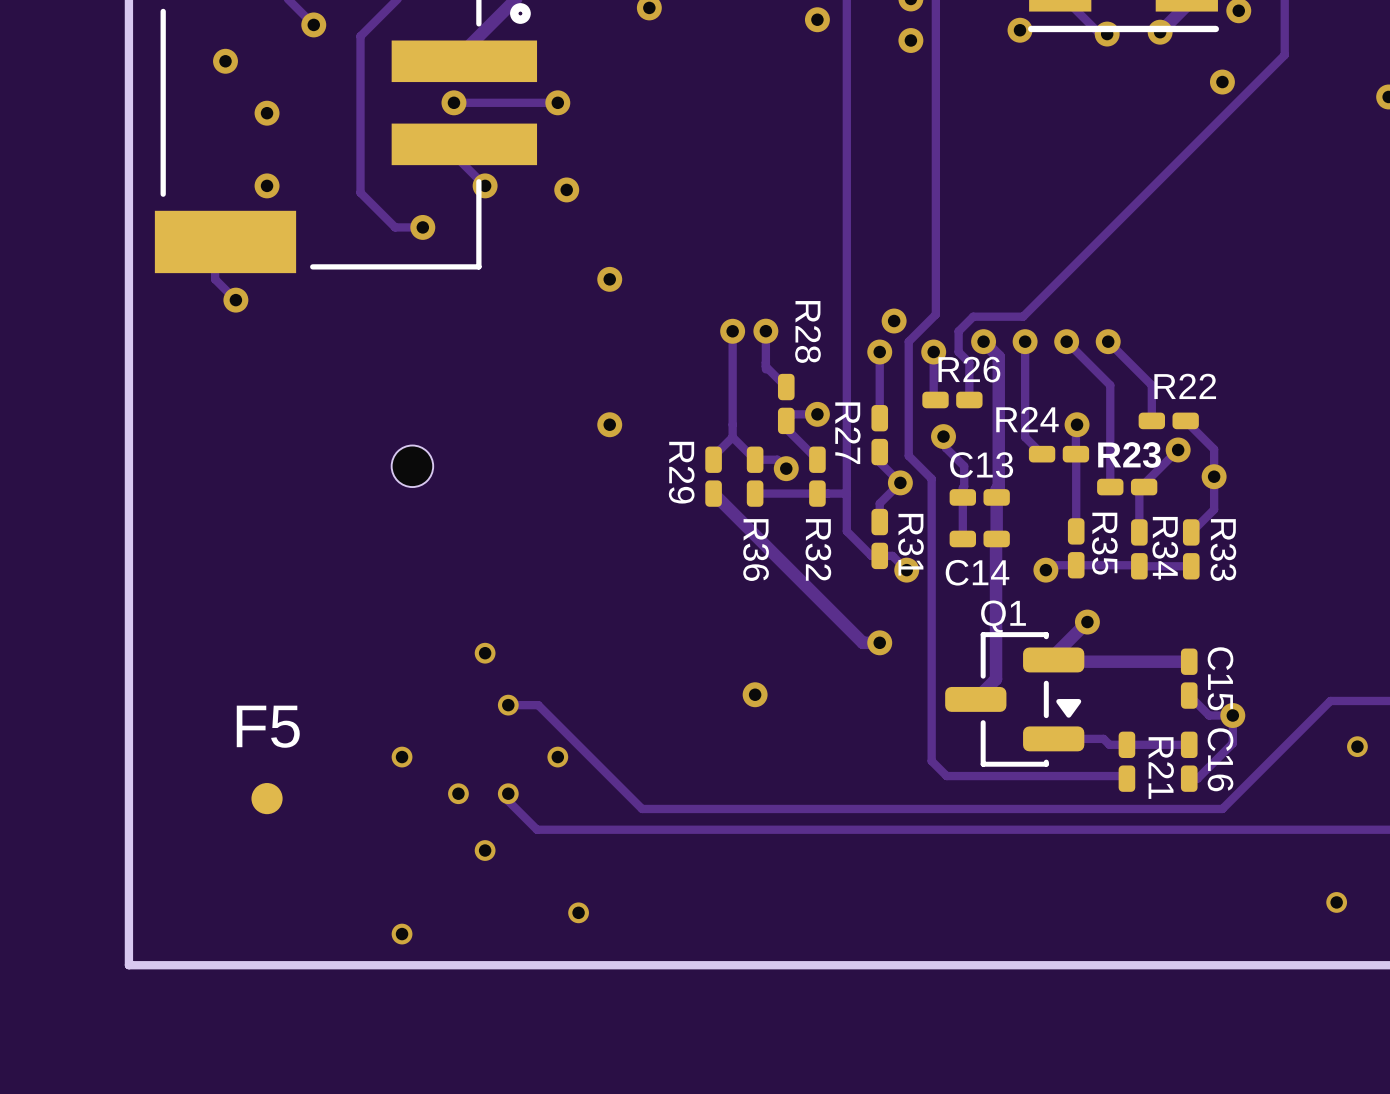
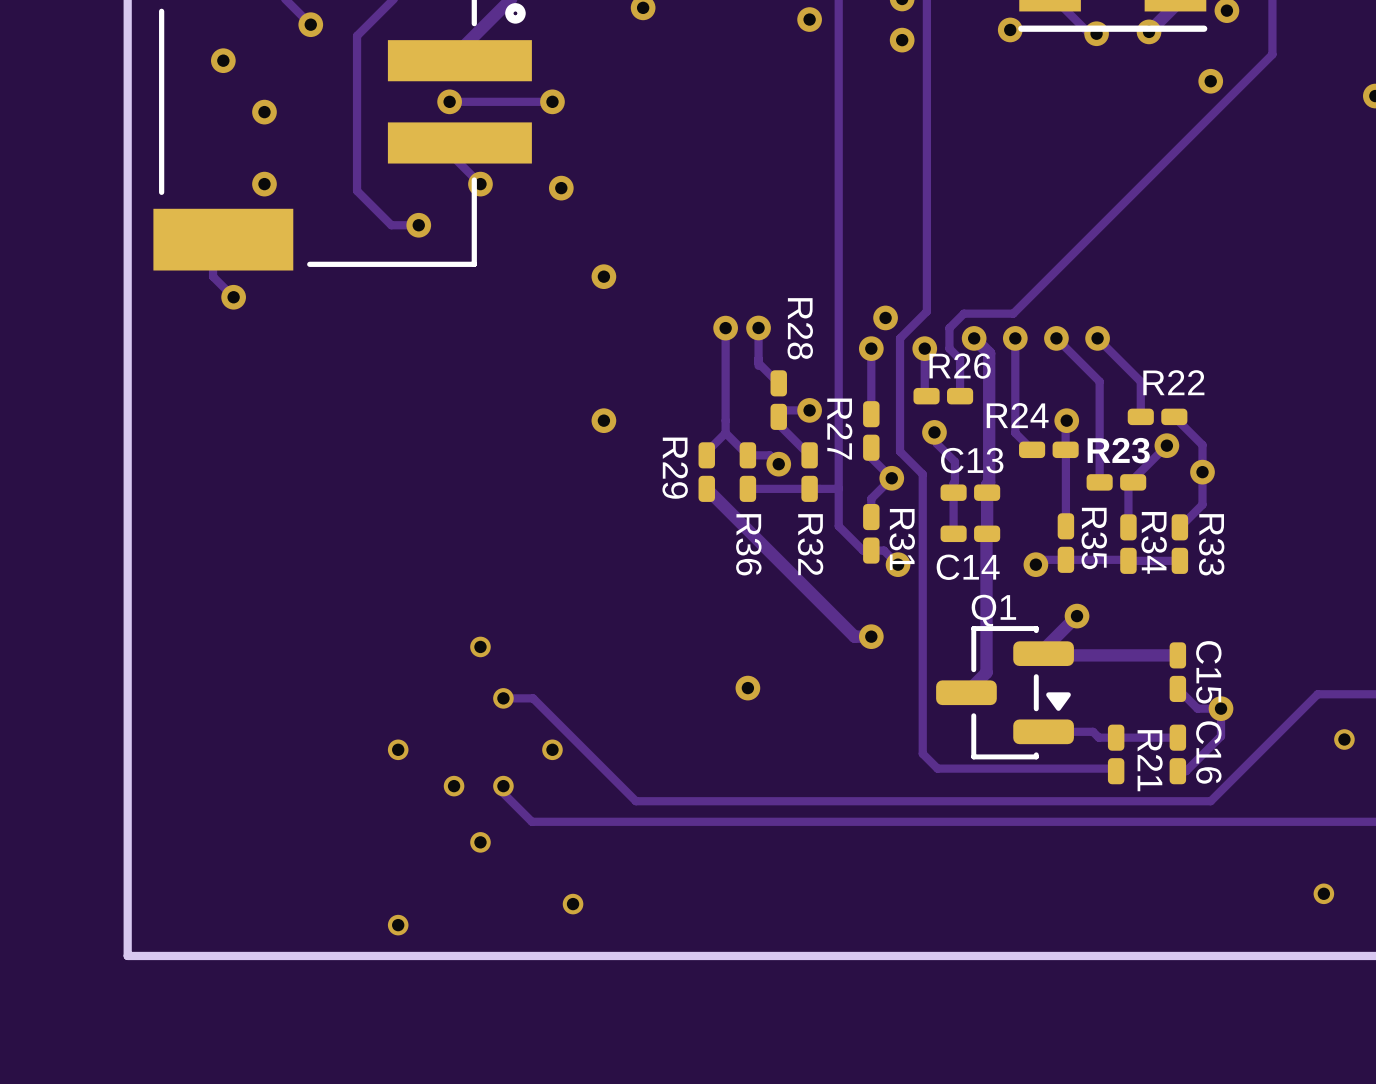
part: (412, 466) -> none
F5: (267, 798) -> none

